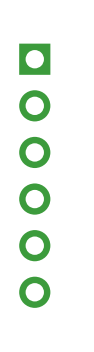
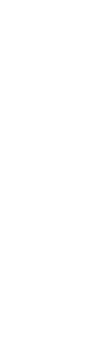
part: (34, 175) -> none

